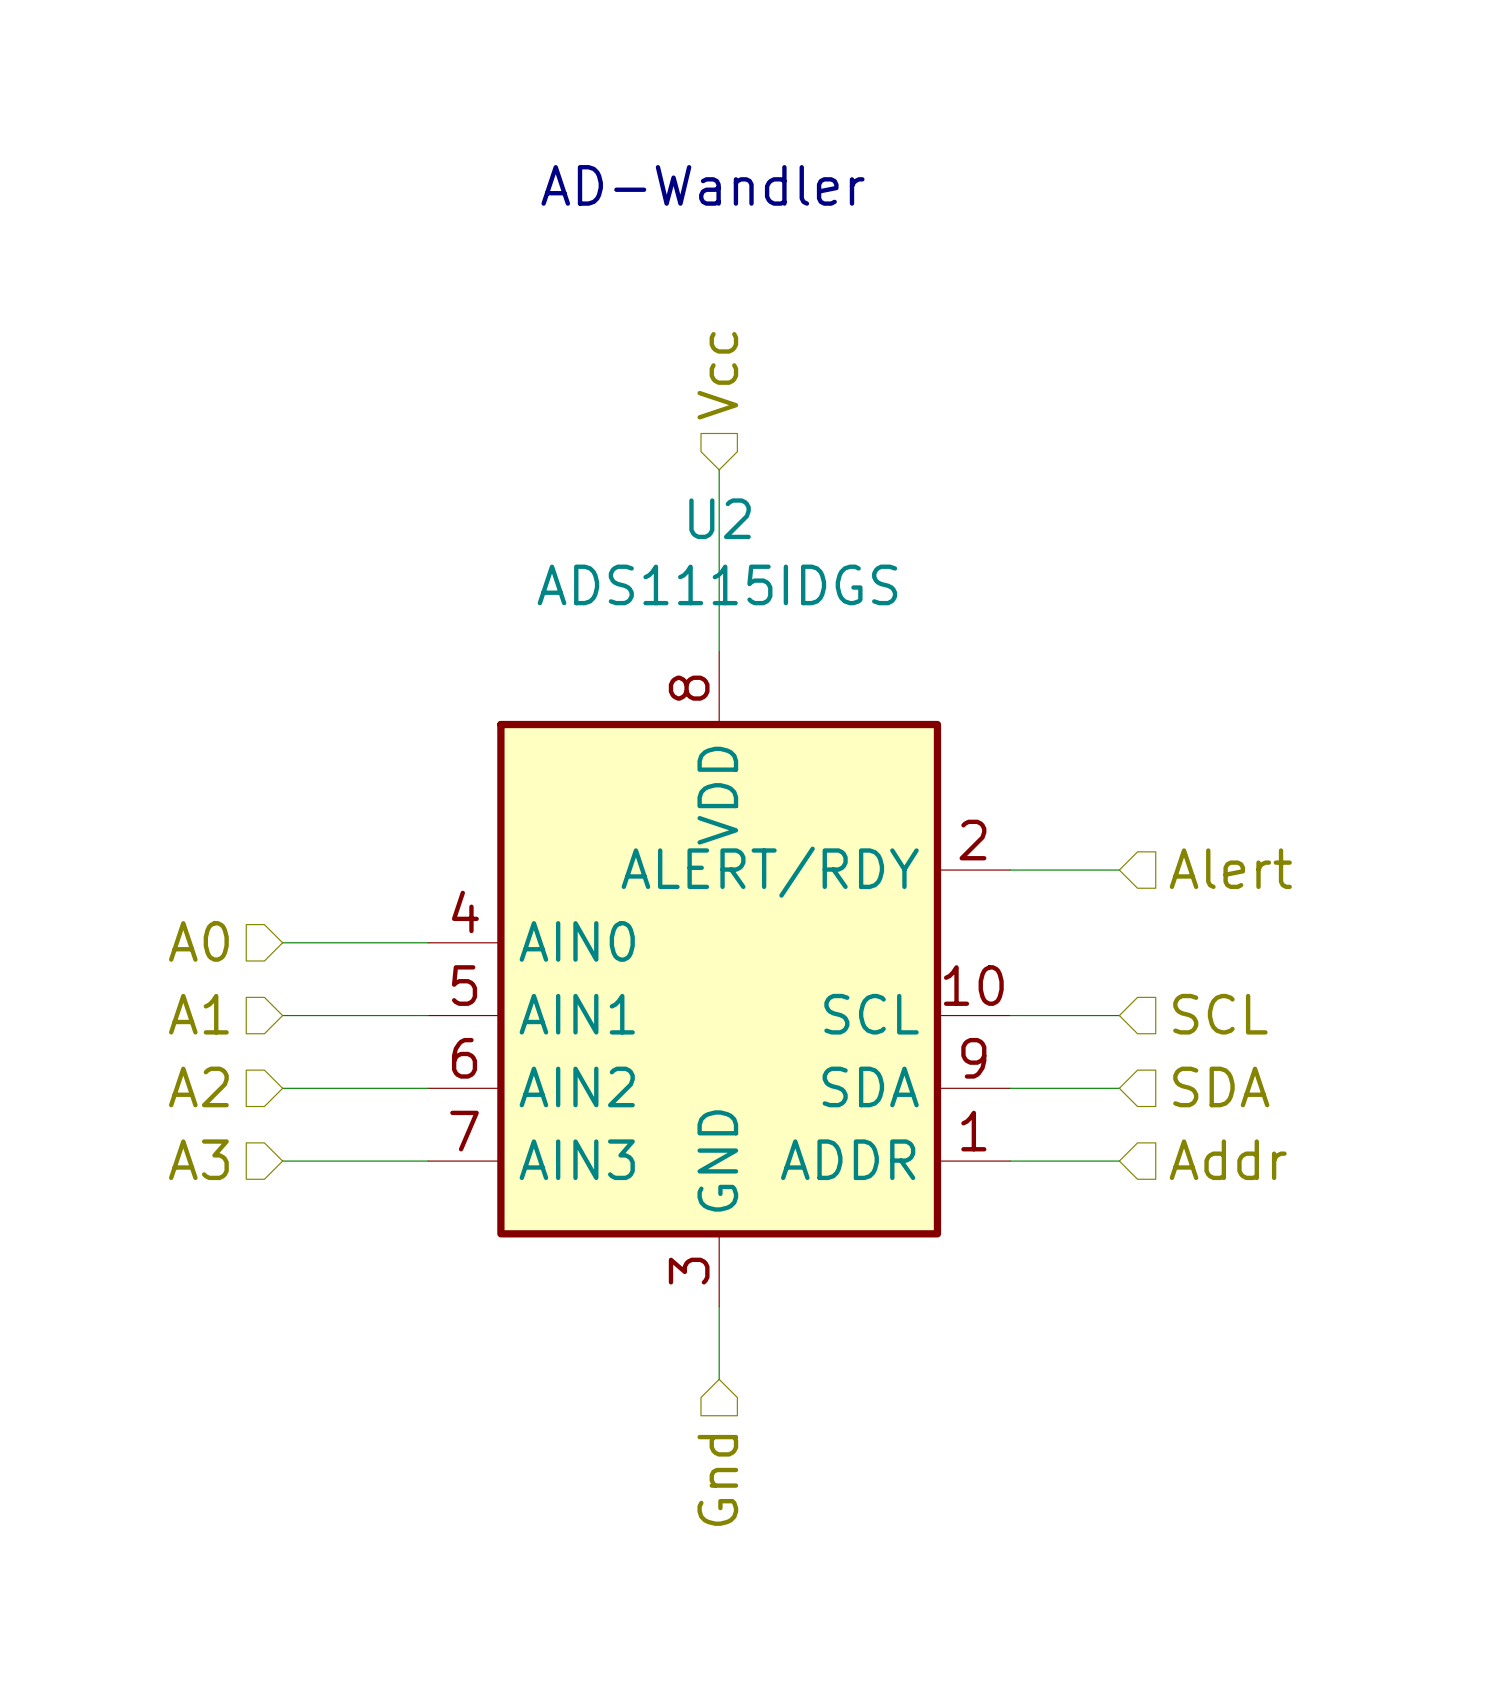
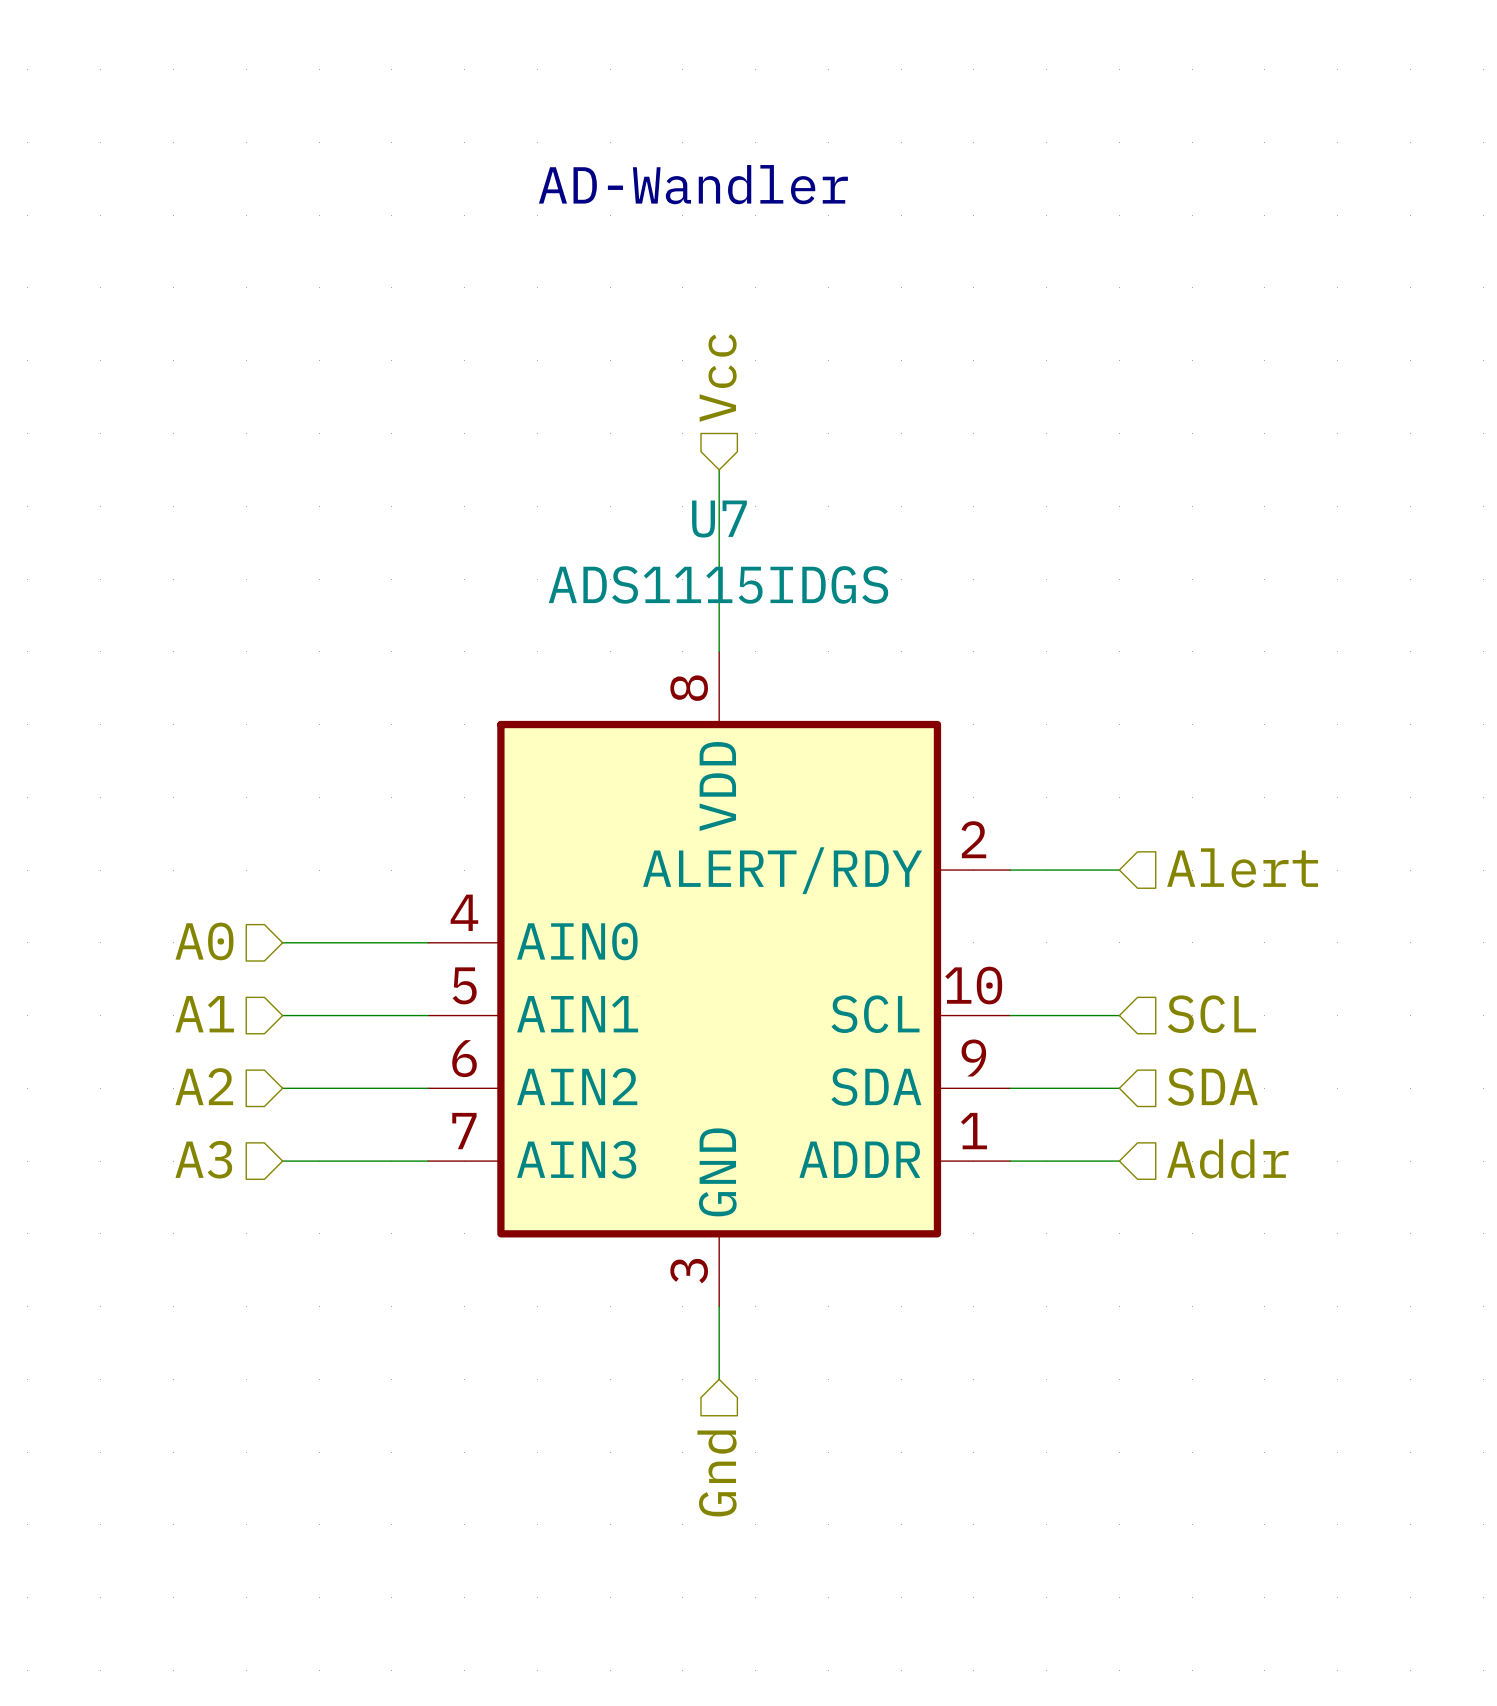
U2 name: U2 (720, 518) -> U7 (719, 519)

